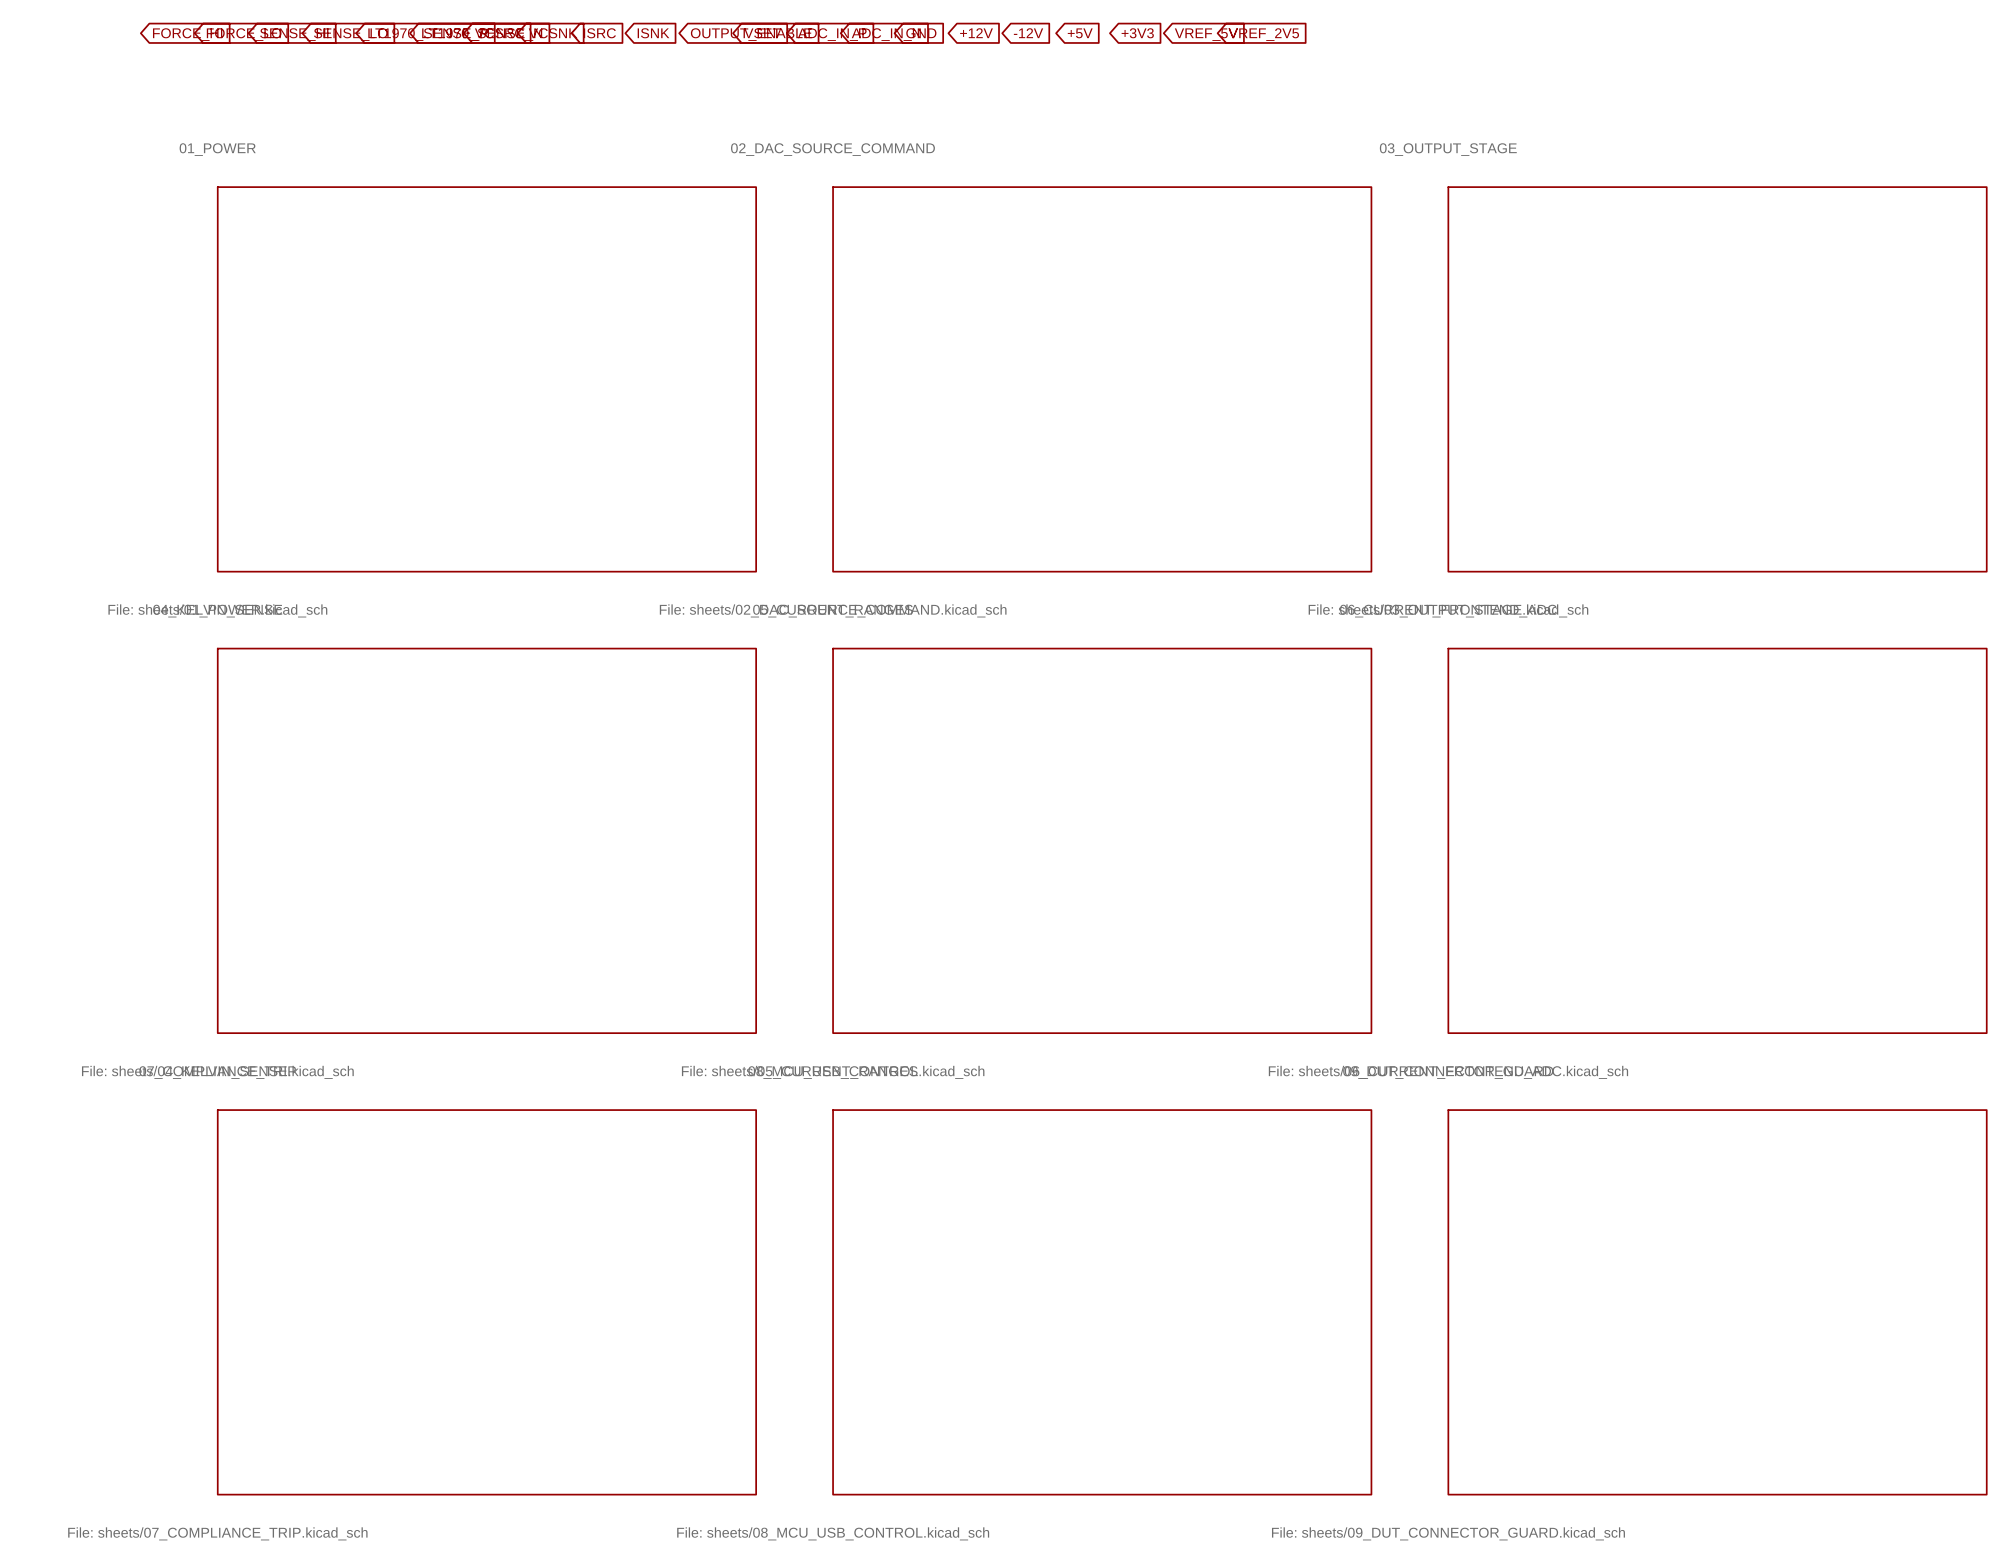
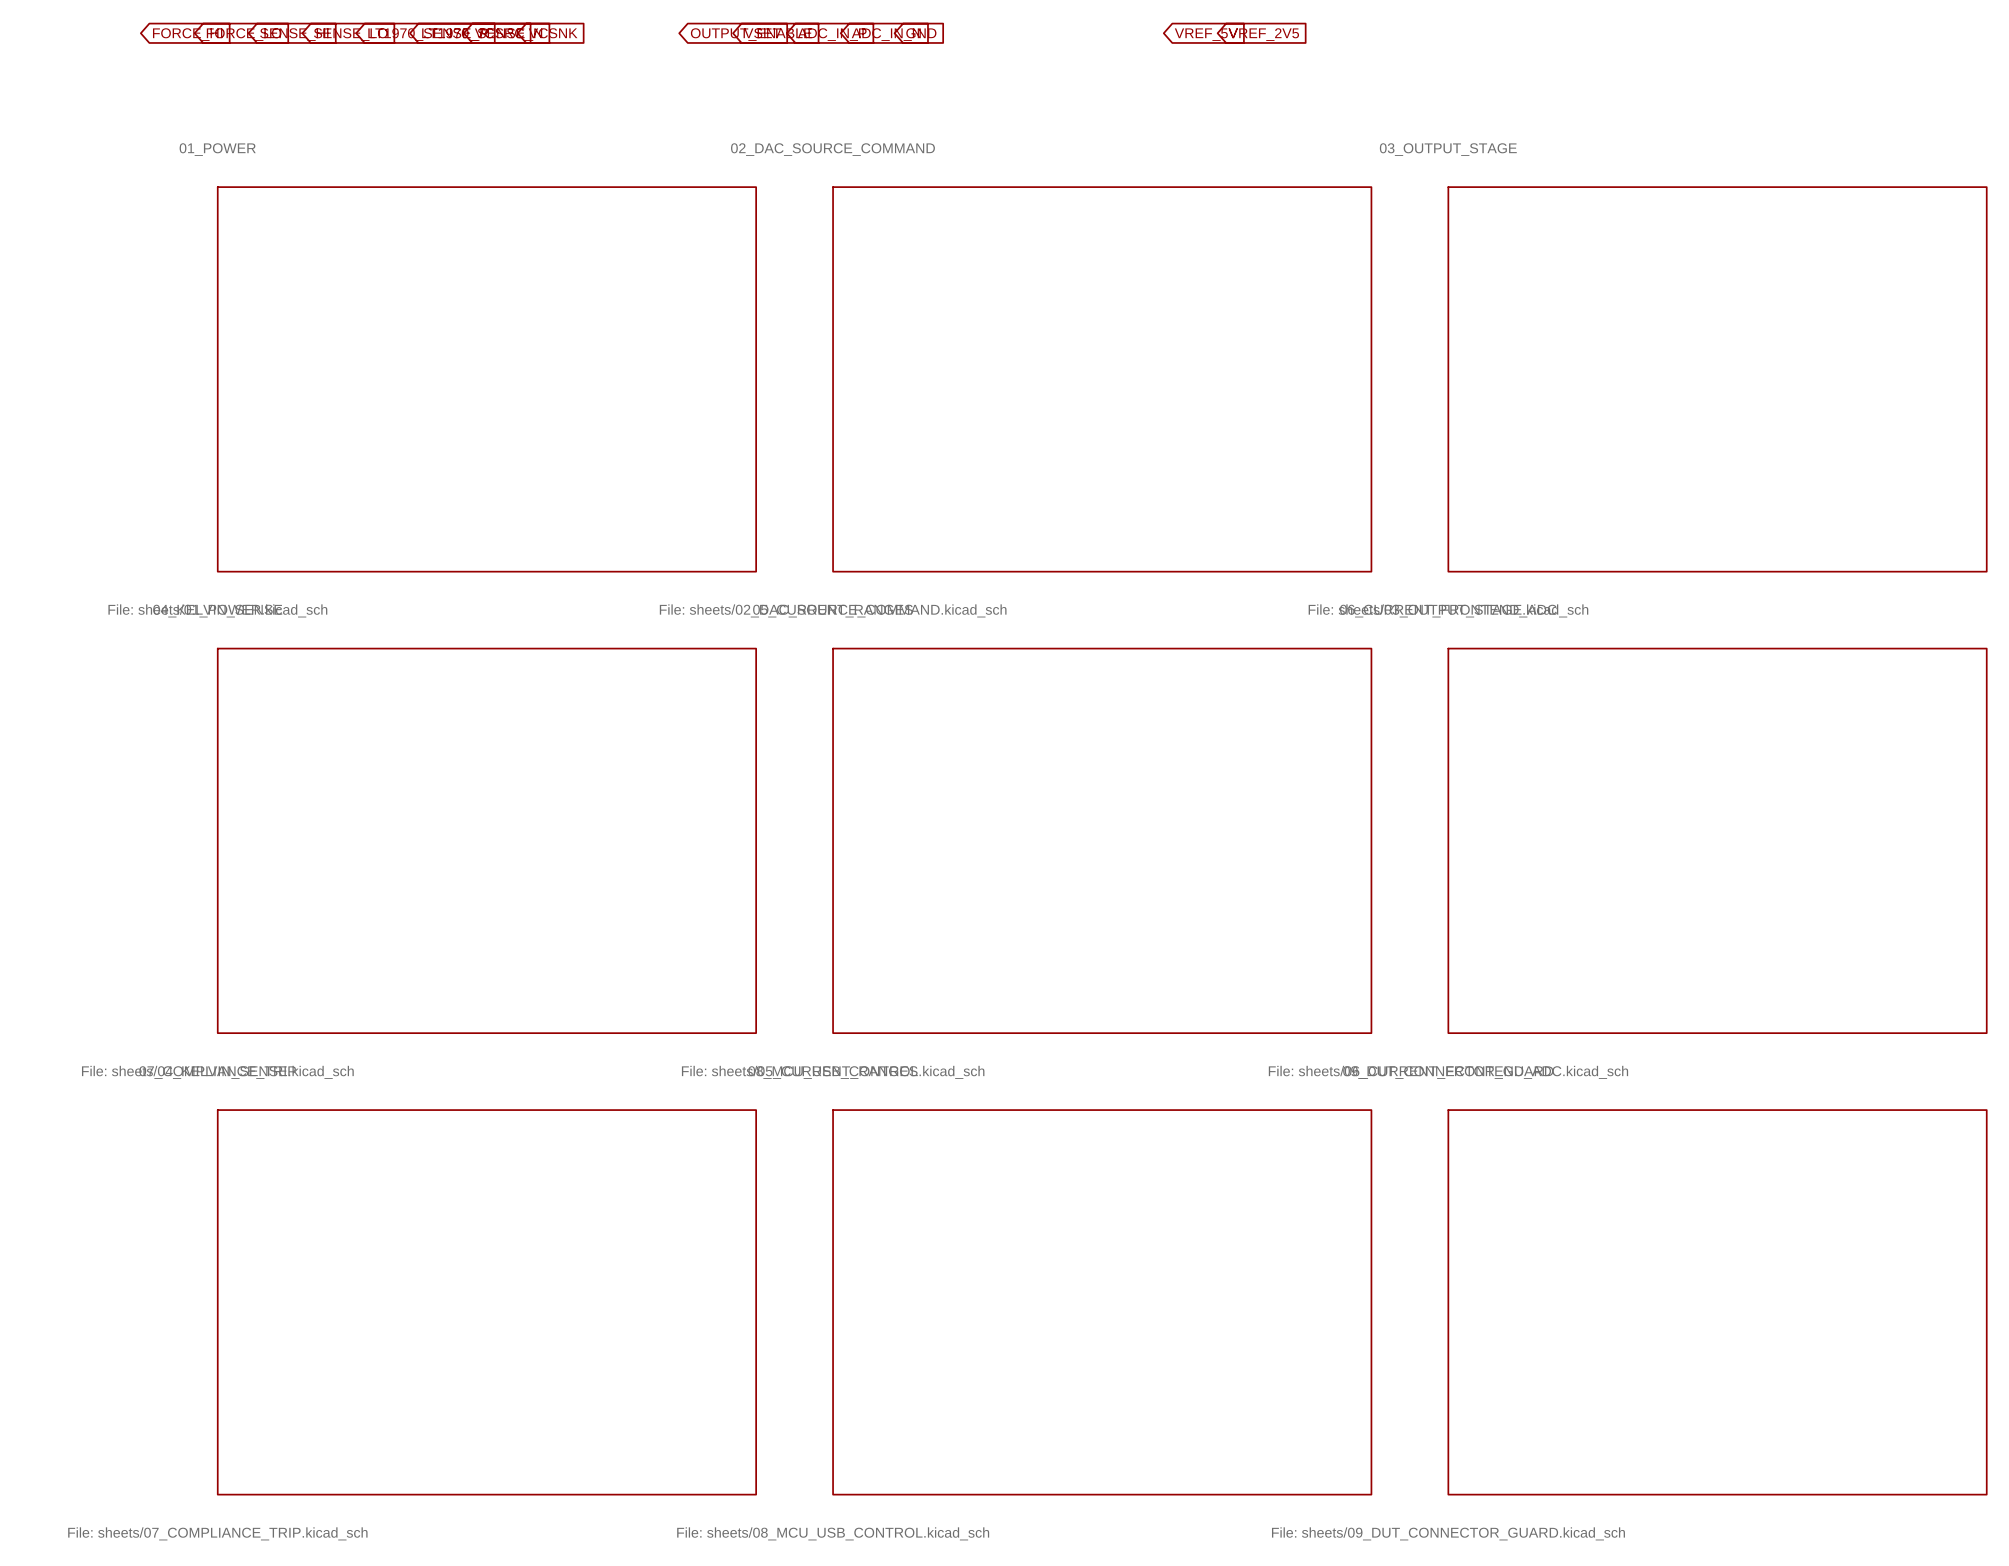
global label: ISRC (599, 33) -> none
global label: ISNK (653, 33) -> none
global label: +12V (976, 33) -> none
global label: -12V (1028, 33) -> none
global label: +5V (1080, 33) -> none
global label: +3V3 (1137, 33) -> none

